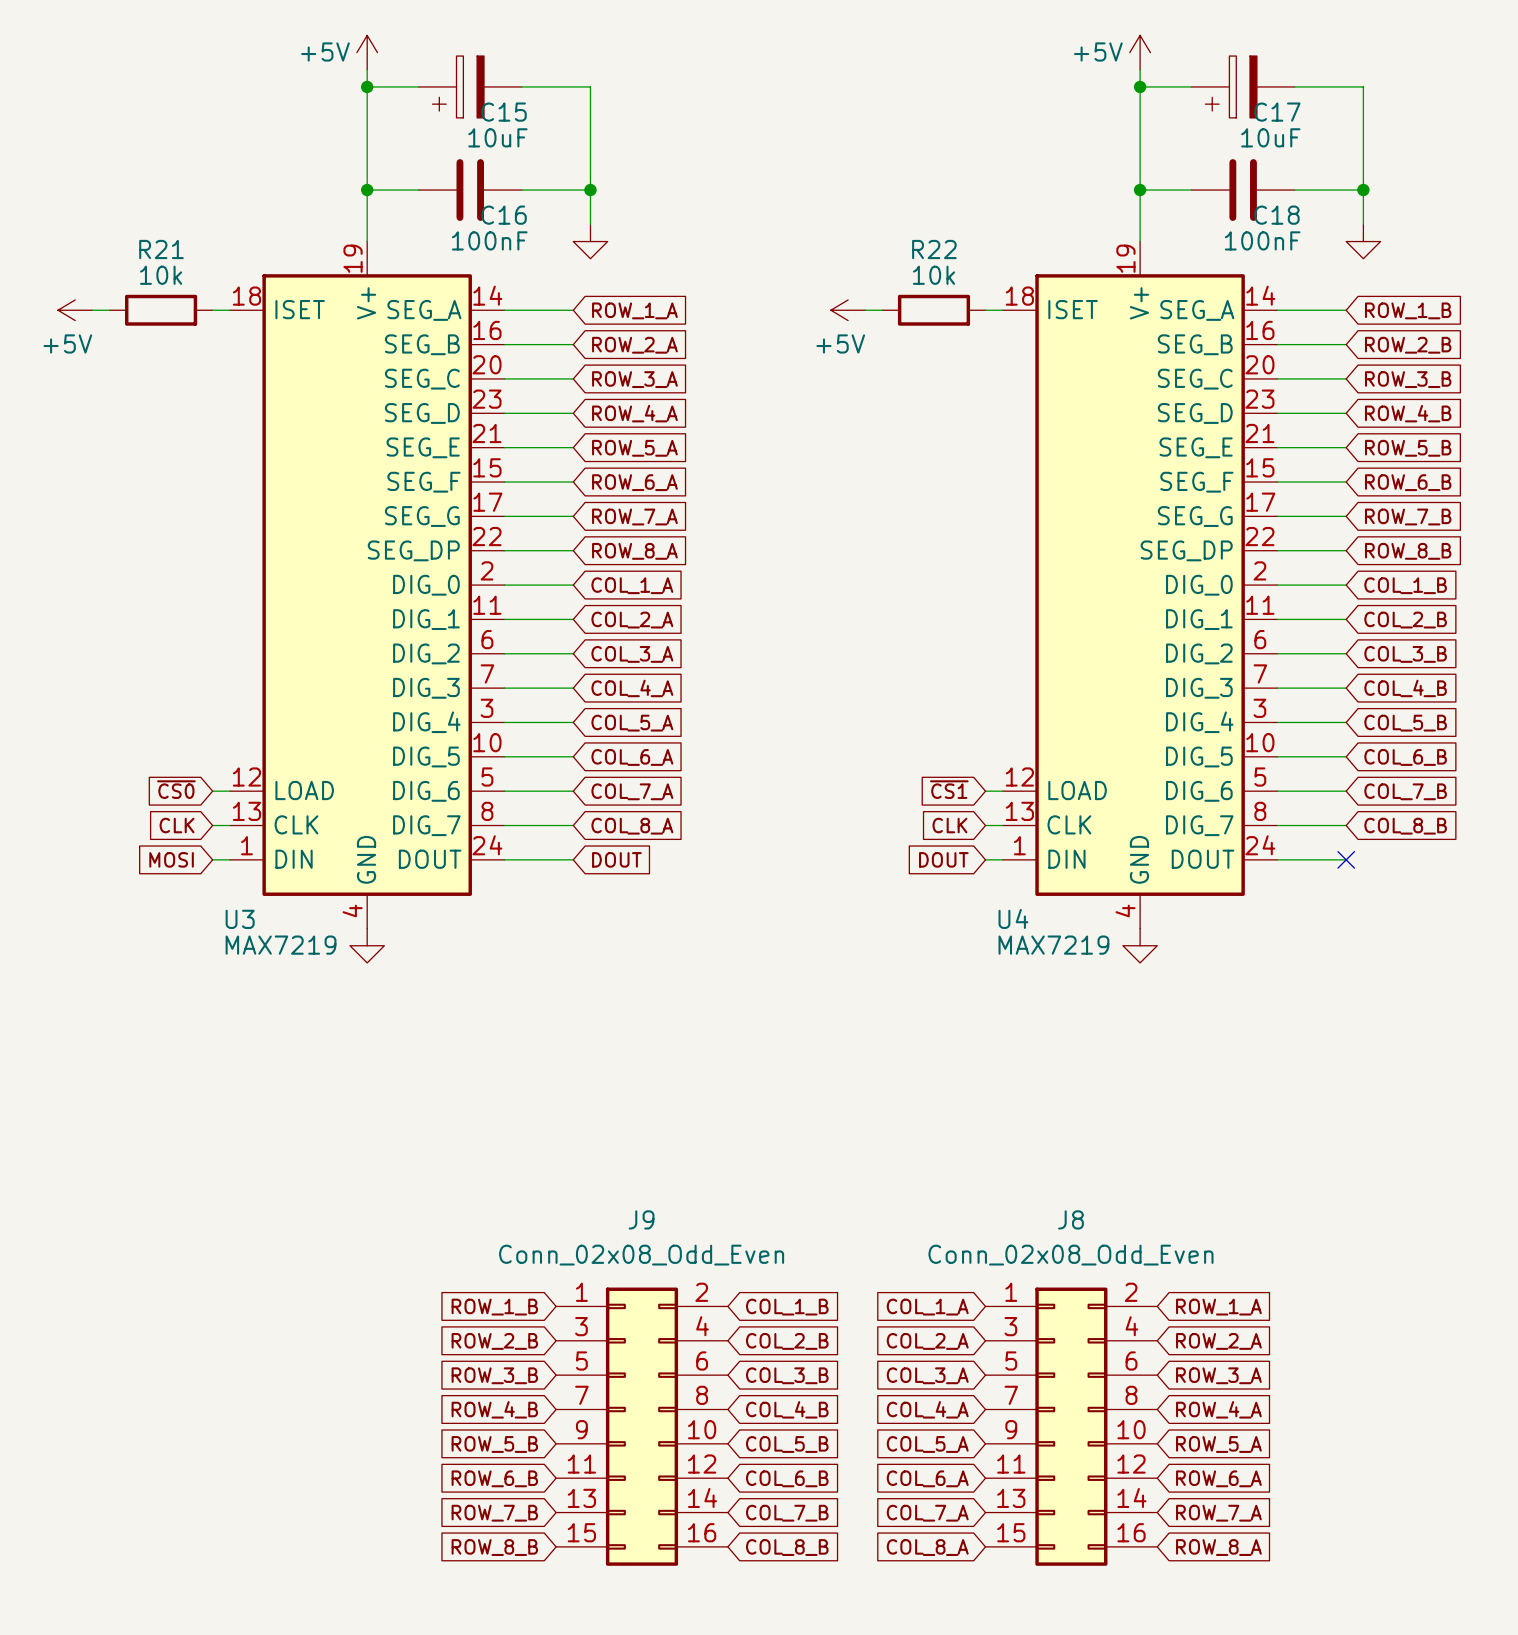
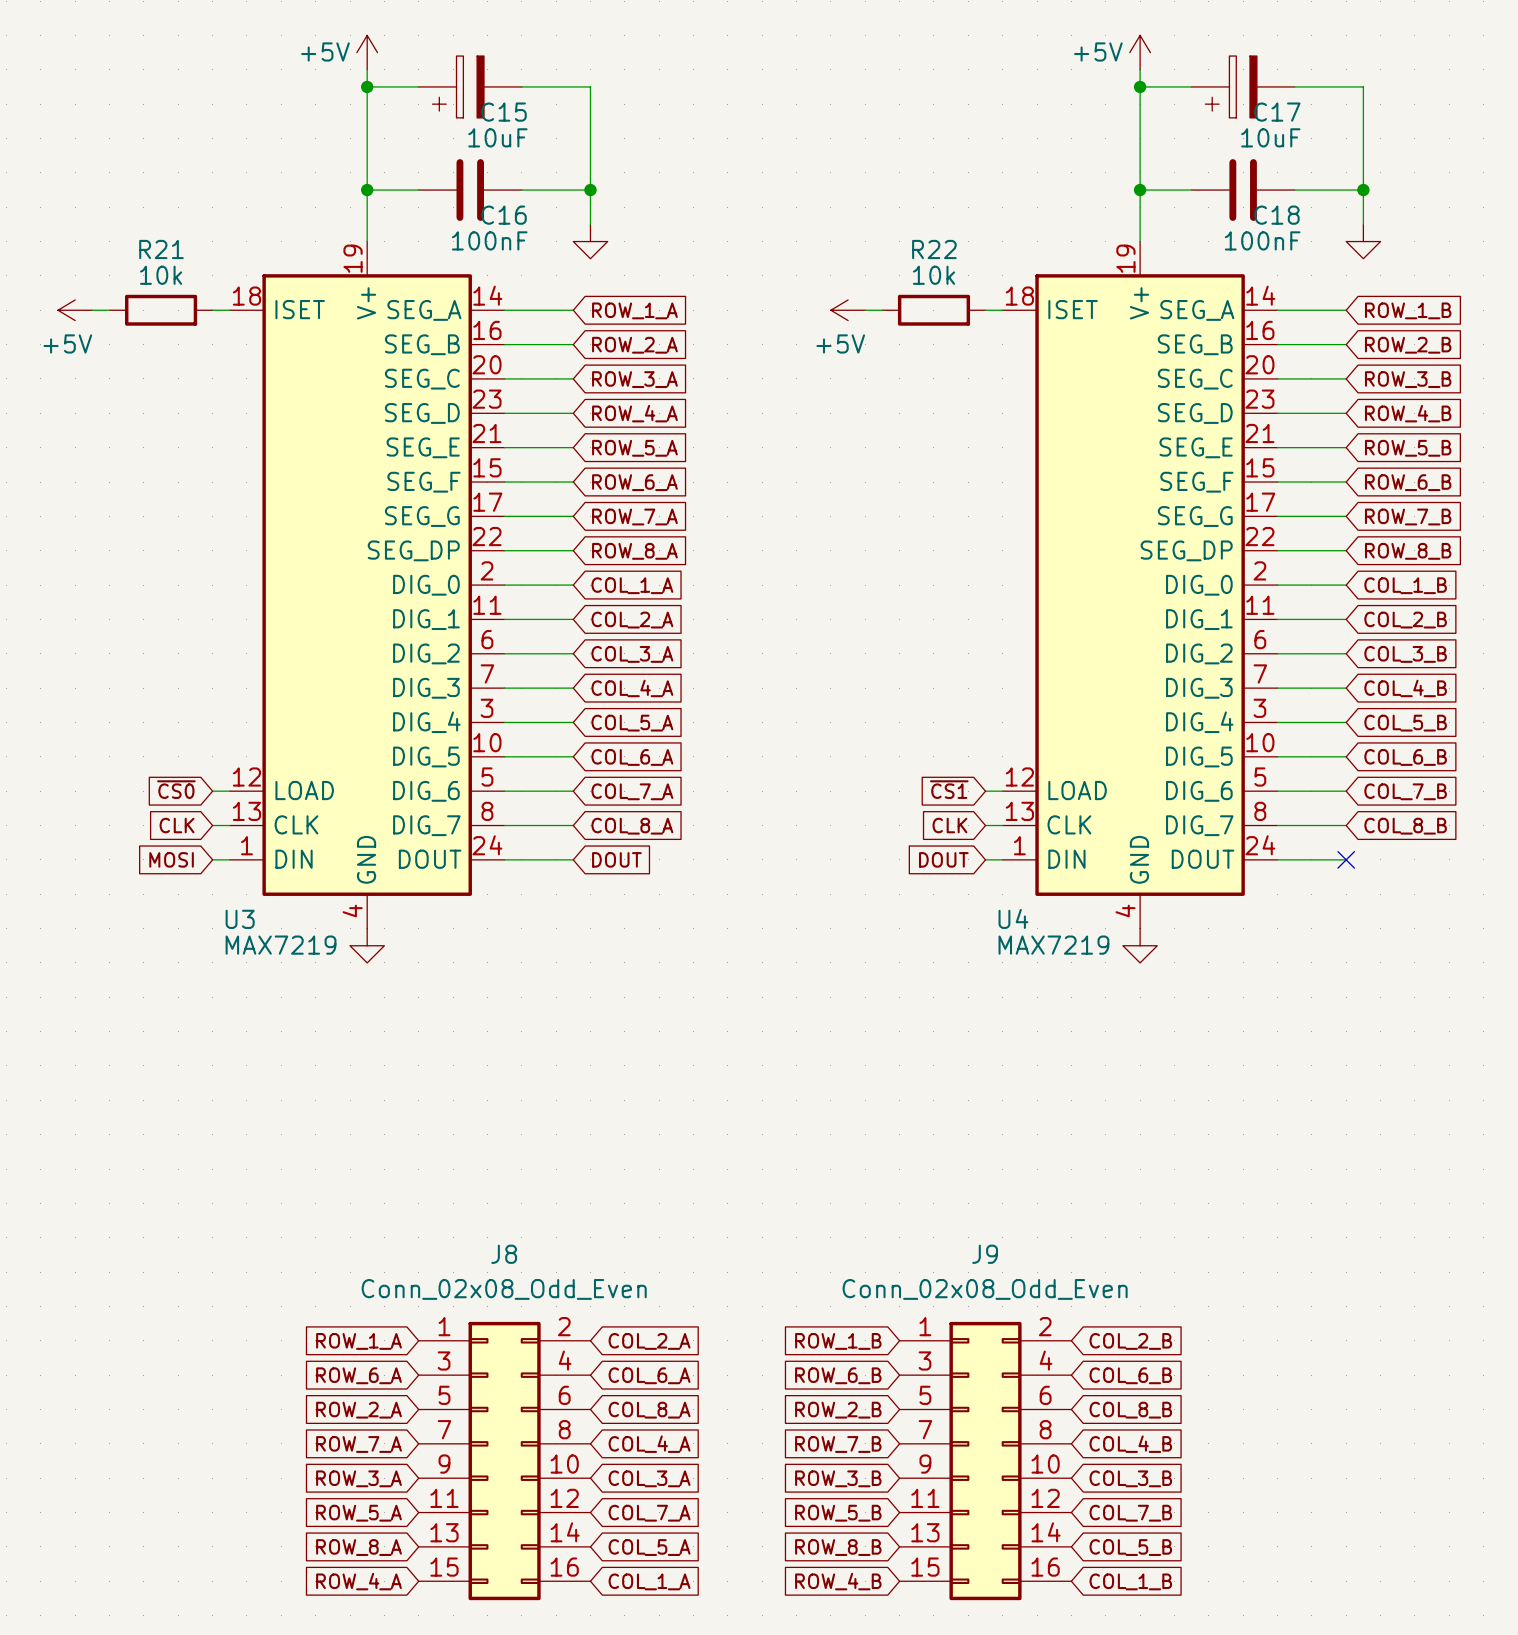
global label: ROW_1_B (494, 1307) -> none
global label: COL_1_B (787, 1307) -> none
global label: COL_1_A (927, 1307) -> none
global label: ROW_1_A (1218, 1307) -> none
global label: none -> ROW_1_A (359, 1341)
global label: ROW_2_B (494, 1341) -> none
global label: none -> COL_2_A (649, 1341)
global label: COL_2_B (787, 1341) -> none
global label: none -> ROW_1_B (838, 1341)
global label: COL_2_A (927, 1341) -> none
global label: none -> COL_2_B (1130, 1341)
global label: ROW_2_A (1218, 1341) -> none
global label: none -> ROW_6_A (359, 1375)
global label: ROW_3_B (494, 1375) -> none
global label: none -> COL_6_A (649, 1375)
global label: COL_3_B (787, 1375) -> none
global label: none -> ROW_6_B (838, 1375)
global label: COL_3_A (927, 1375) -> none
global label: none -> COL_6_B (1130, 1375)
global label: ROW_3_A (1218, 1375) -> none
global label: ROW_4_B (494, 1409) -> none
global label: COL_4_B (787, 1409) -> none
global label: COL_4_A (927, 1409) -> none
global label: ROW_4_A (1218, 1409) -> none
global label: none -> ROW_2_A (359, 1410)
global label: none -> COL_8_A (649, 1410)
global label: none -> ROW_2_B (838, 1410)
global label: none -> COL_8_B (1130, 1410)
J9 position: (642, 1426) -> (985, 1461)
J8 position: (1071, 1426) -> (504, 1461)
global label: none -> ROW_7_A (359, 1444)
global label: ROW_5_B (494, 1444) -> none
global label: none -> COL_4_A (649, 1444)
global label: COL_5_B (787, 1444) -> none
global label: none -> ROW_7_B (838, 1444)
global label: COL_5_A (927, 1444) -> none
global label: none -> COL_4_B (1130, 1444)
global label: ROW_5_A (1218, 1444) -> none
global label: none -> ROW_3_A (359, 1478)
global label: ROW_6_B (494, 1478) -> none
global label: none -> COL_3_A (649, 1478)
global label: COL_6_B (787, 1478) -> none
global label: none -> ROW_3_B (838, 1478)
global label: COL_6_A (927, 1478) -> none
global label: none -> COL_3_B (1130, 1478)
global label: ROW_6_A (1218, 1478) -> none
global label: none -> ROW_5_A (359, 1513)
global label: ROW_7_B (494, 1513) -> none
global label: none -> COL_7_A (649, 1513)
global label: COL_7_B (787, 1513) -> none
global label: none -> ROW_5_B (838, 1513)
global label: COL_7_A (927, 1513) -> none
global label: none -> COL_7_B (1130, 1513)
global label: ROW_7_A (1218, 1513) -> none
global label: none -> ROW_8_A (359, 1547)
global label: ROW_8_B (494, 1547) -> none
global label: none -> COL_5_A (649, 1547)
global label: COL_8_B (787, 1547) -> ROW_8_B (838, 1547)
global label: COL_8_A (927, 1547) -> none
global label: none -> COL_5_B (1130, 1547)
global label: ROW_8_A (1218, 1547) -> none
global label: none -> ROW_4_A (359, 1581)
global label: none -> COL_1_A (649, 1581)
global label: none -> ROW_4_B (838, 1581)
global label: none -> COL_1_B (1130, 1581)

